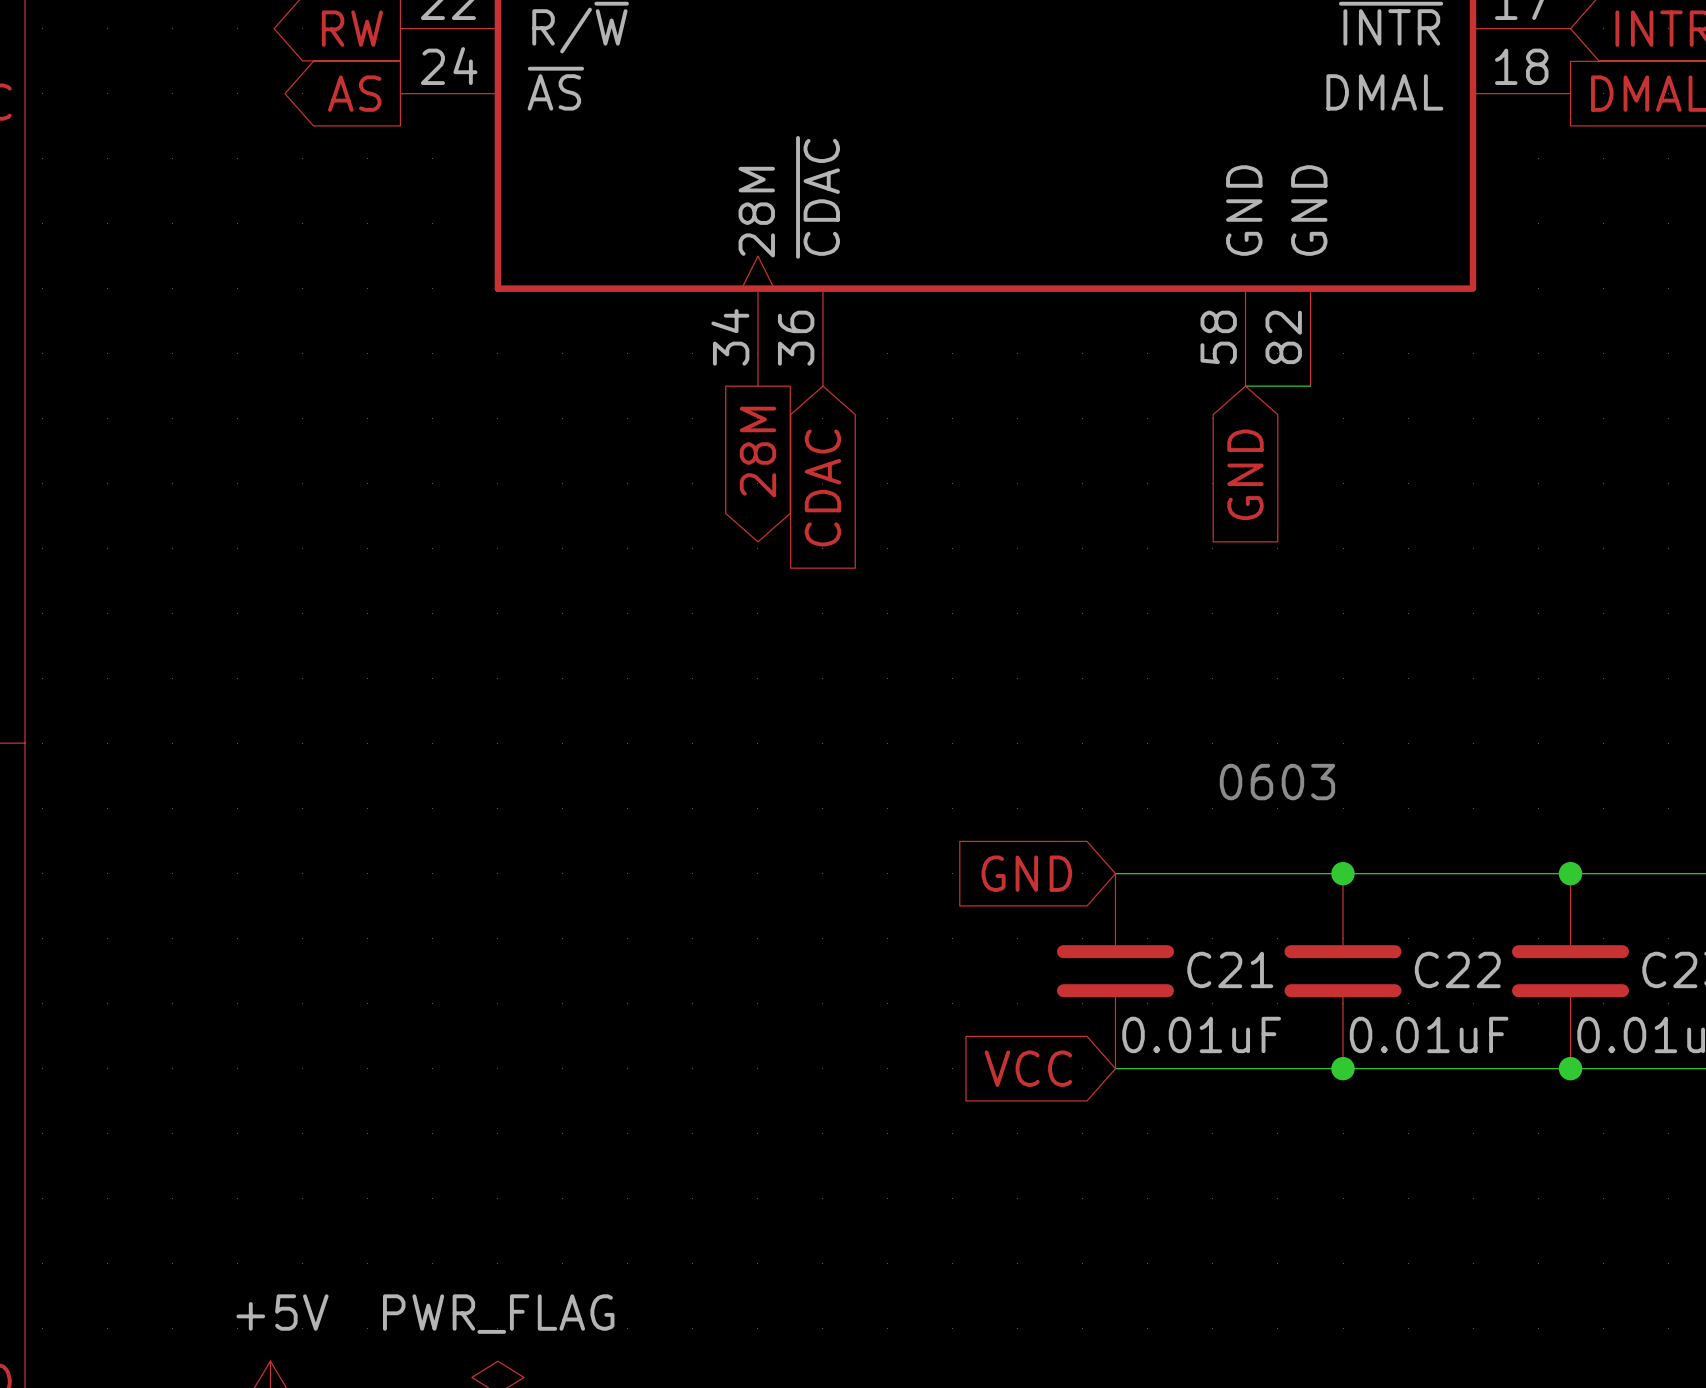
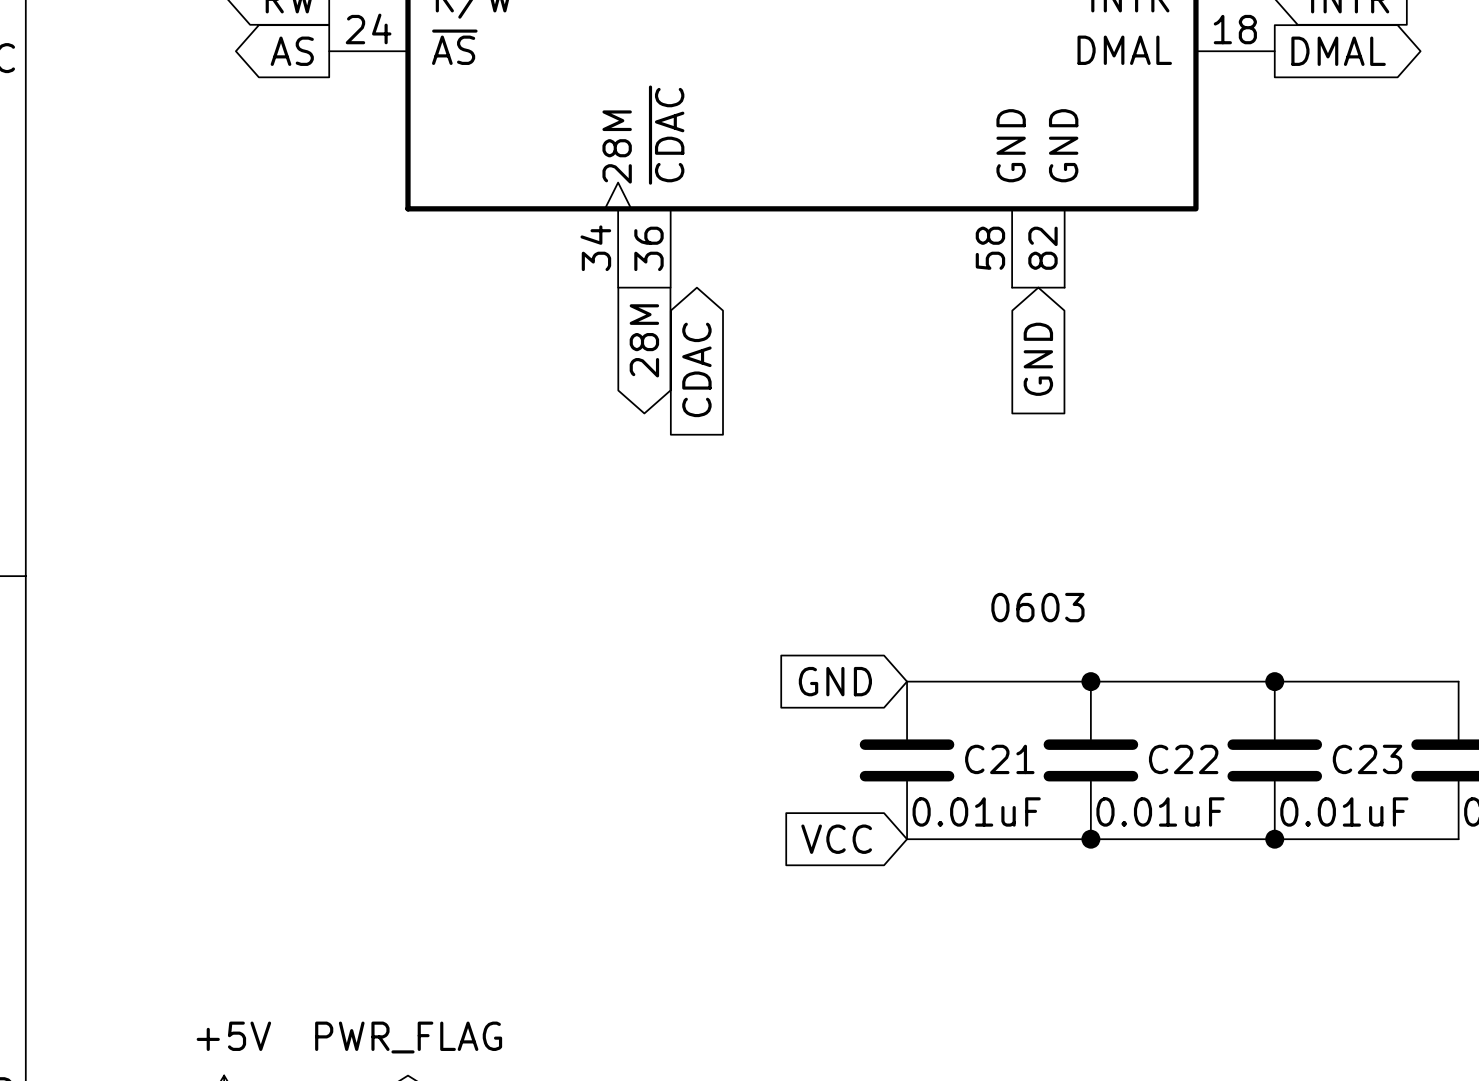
global label position: 28M (757, 451) -> 28M (644, 340)
global label position: GND (1245, 474) -> GND (1038, 359)
global label position: CDAC (822, 487) -> CDAC (696, 369)

